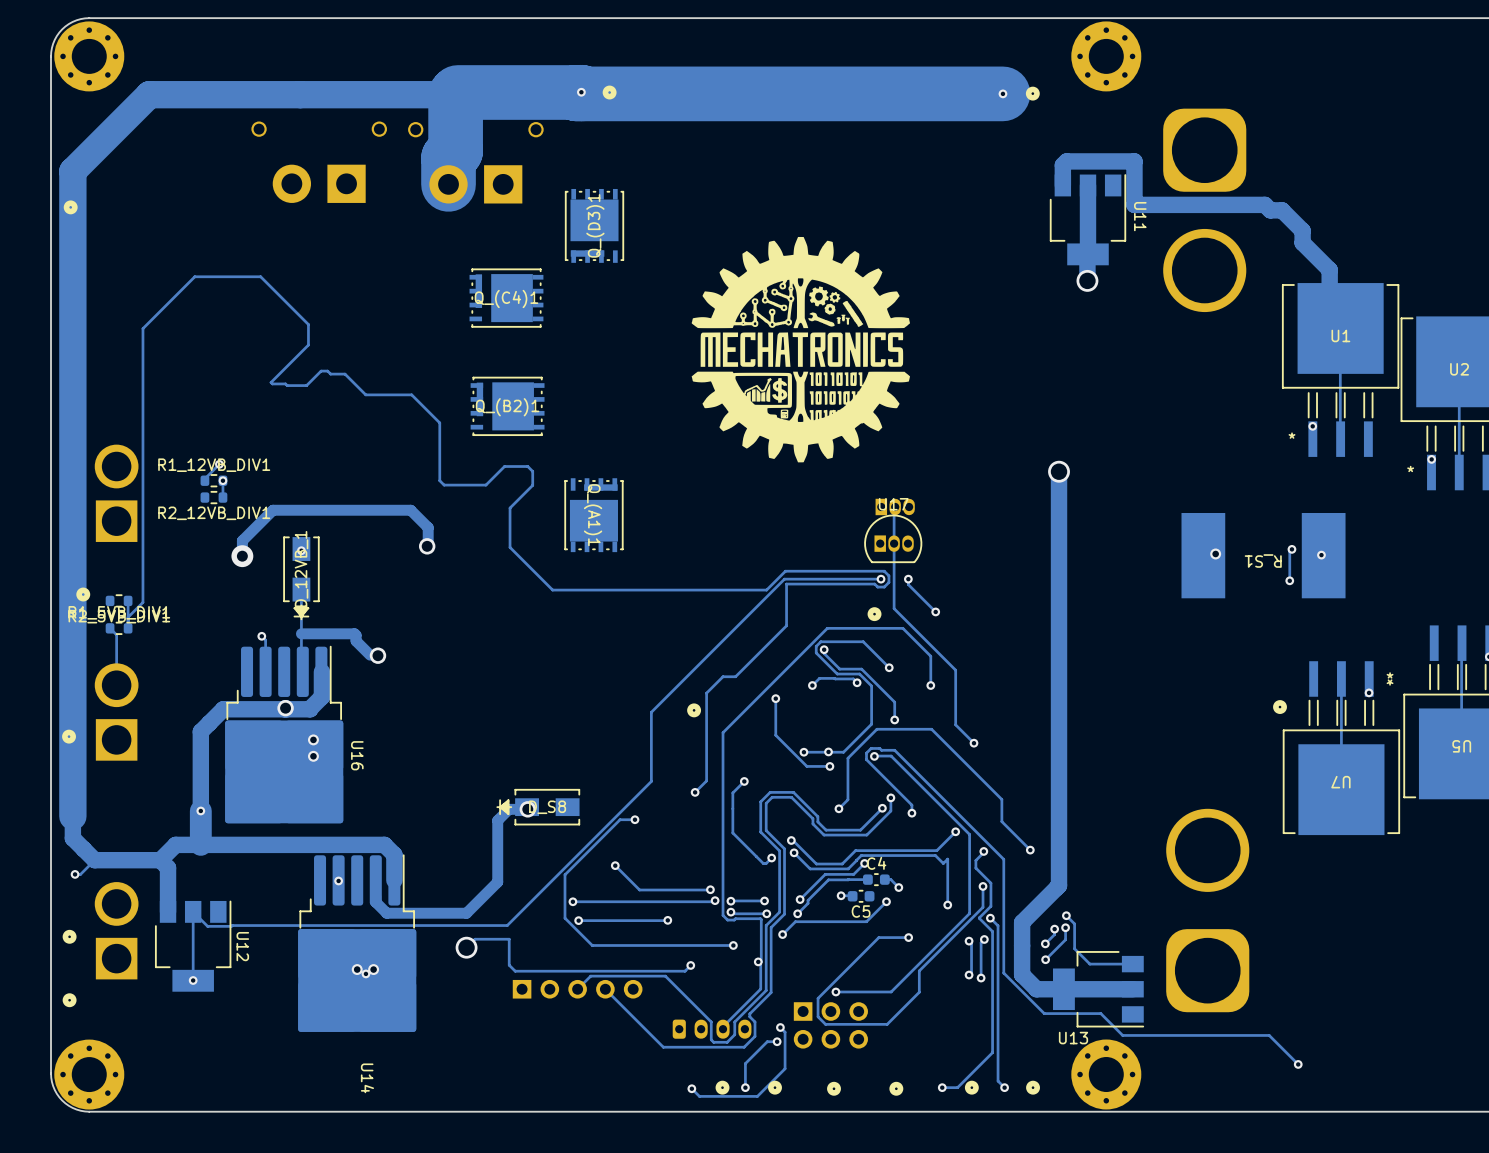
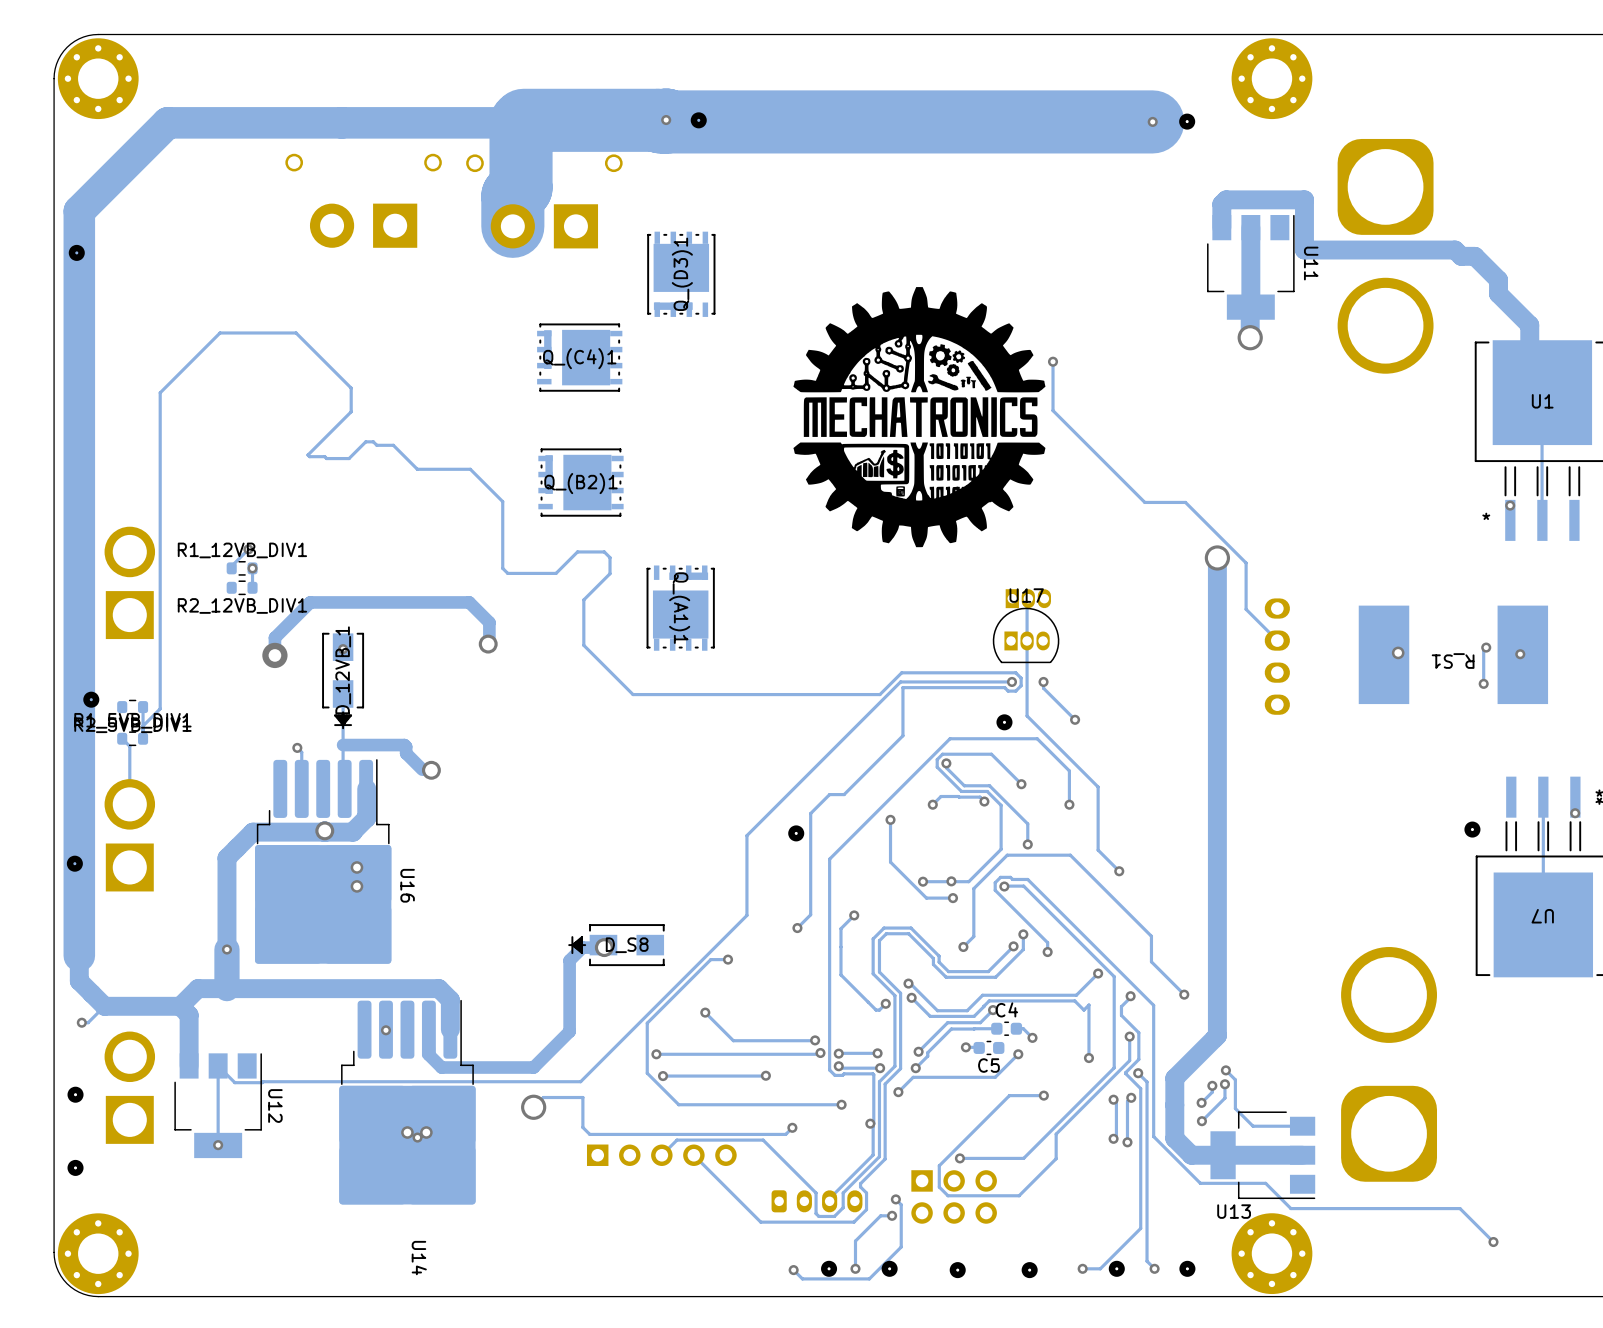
track: none -> (1053, 361) (1053, 410) (1144, 502) (1185, 502) (1246, 563) (1246, 609) (1277, 640)
via: none -> (1053, 361)
part: none -> (1277, 656)

